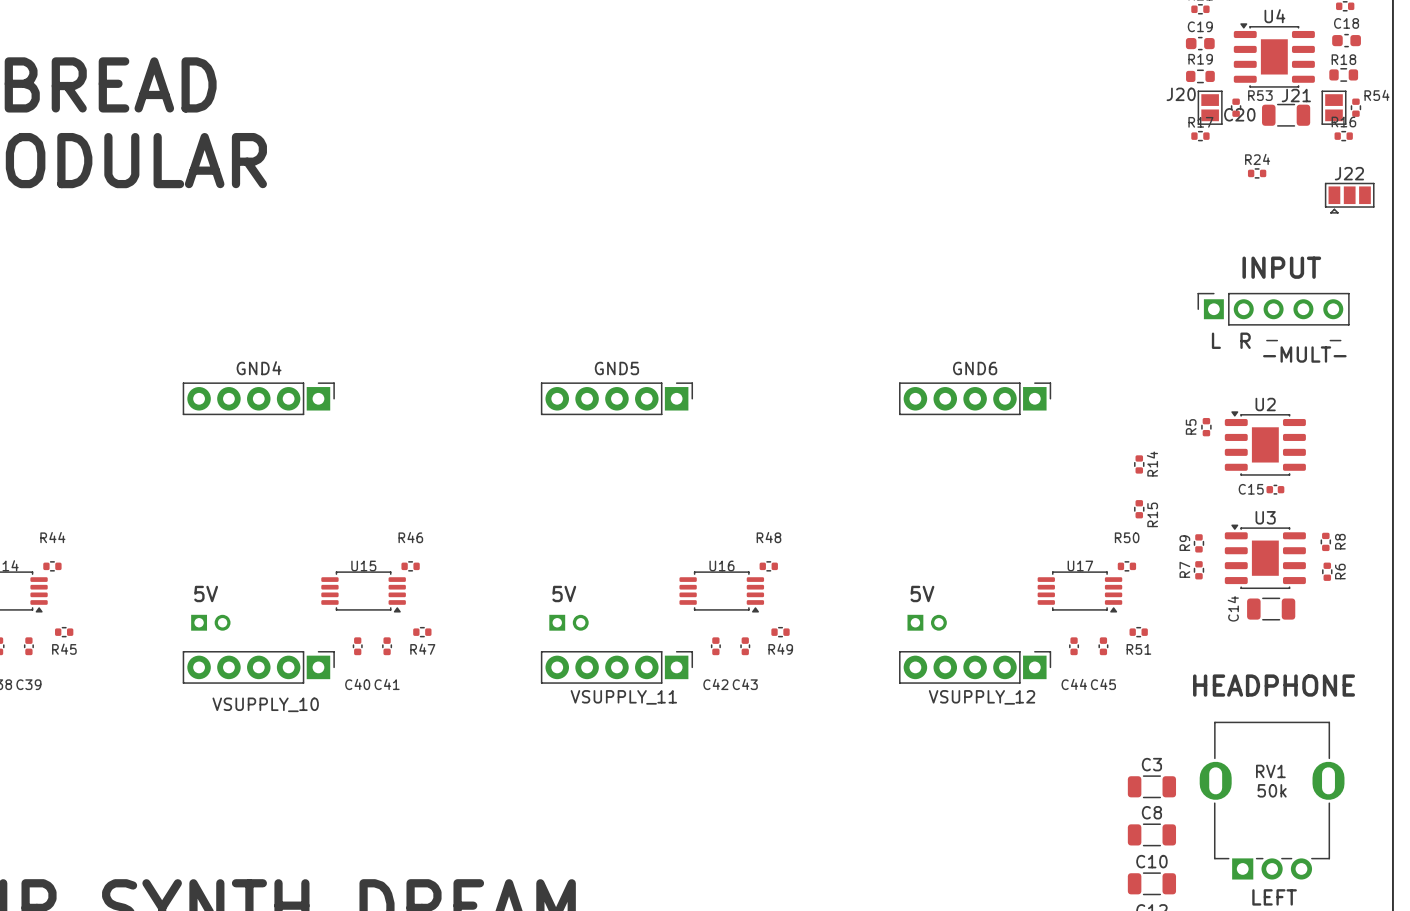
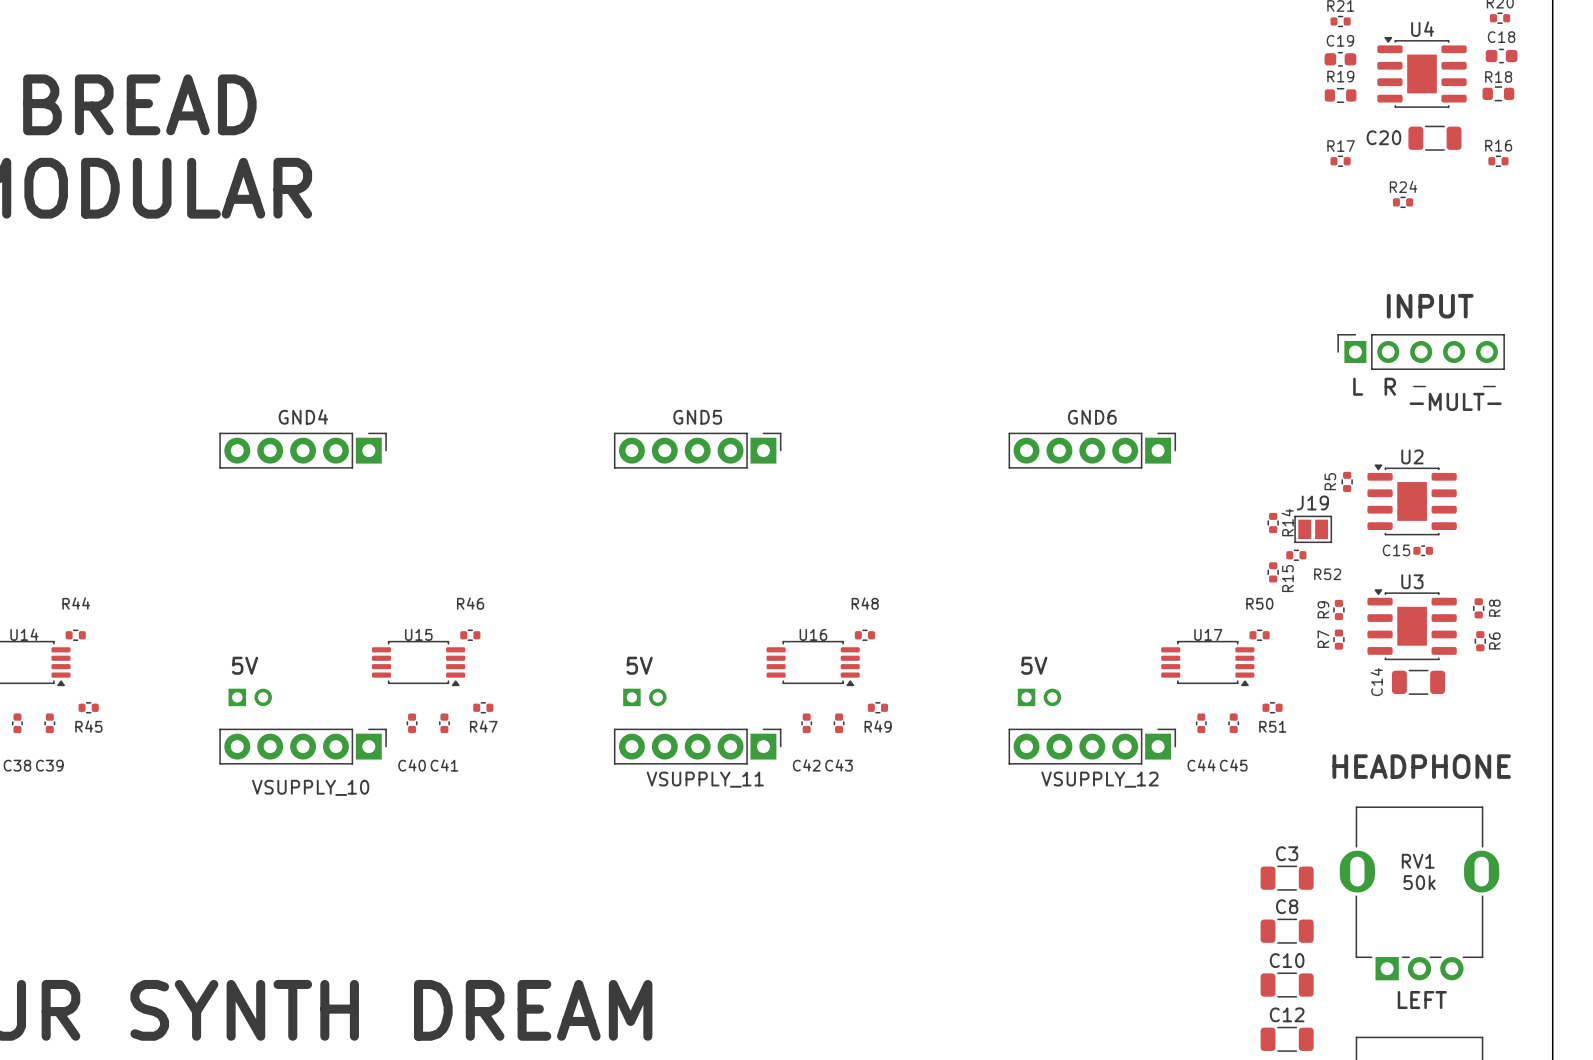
J20: (1210, 107) -> none
R53: (1236, 107) -> none
J21: (1334, 107) -> none
R54: (1355, 107) -> none
J22: (1349, 198) -> none
J19: none -> (1313, 529)
R52: none -> (1296, 555)

